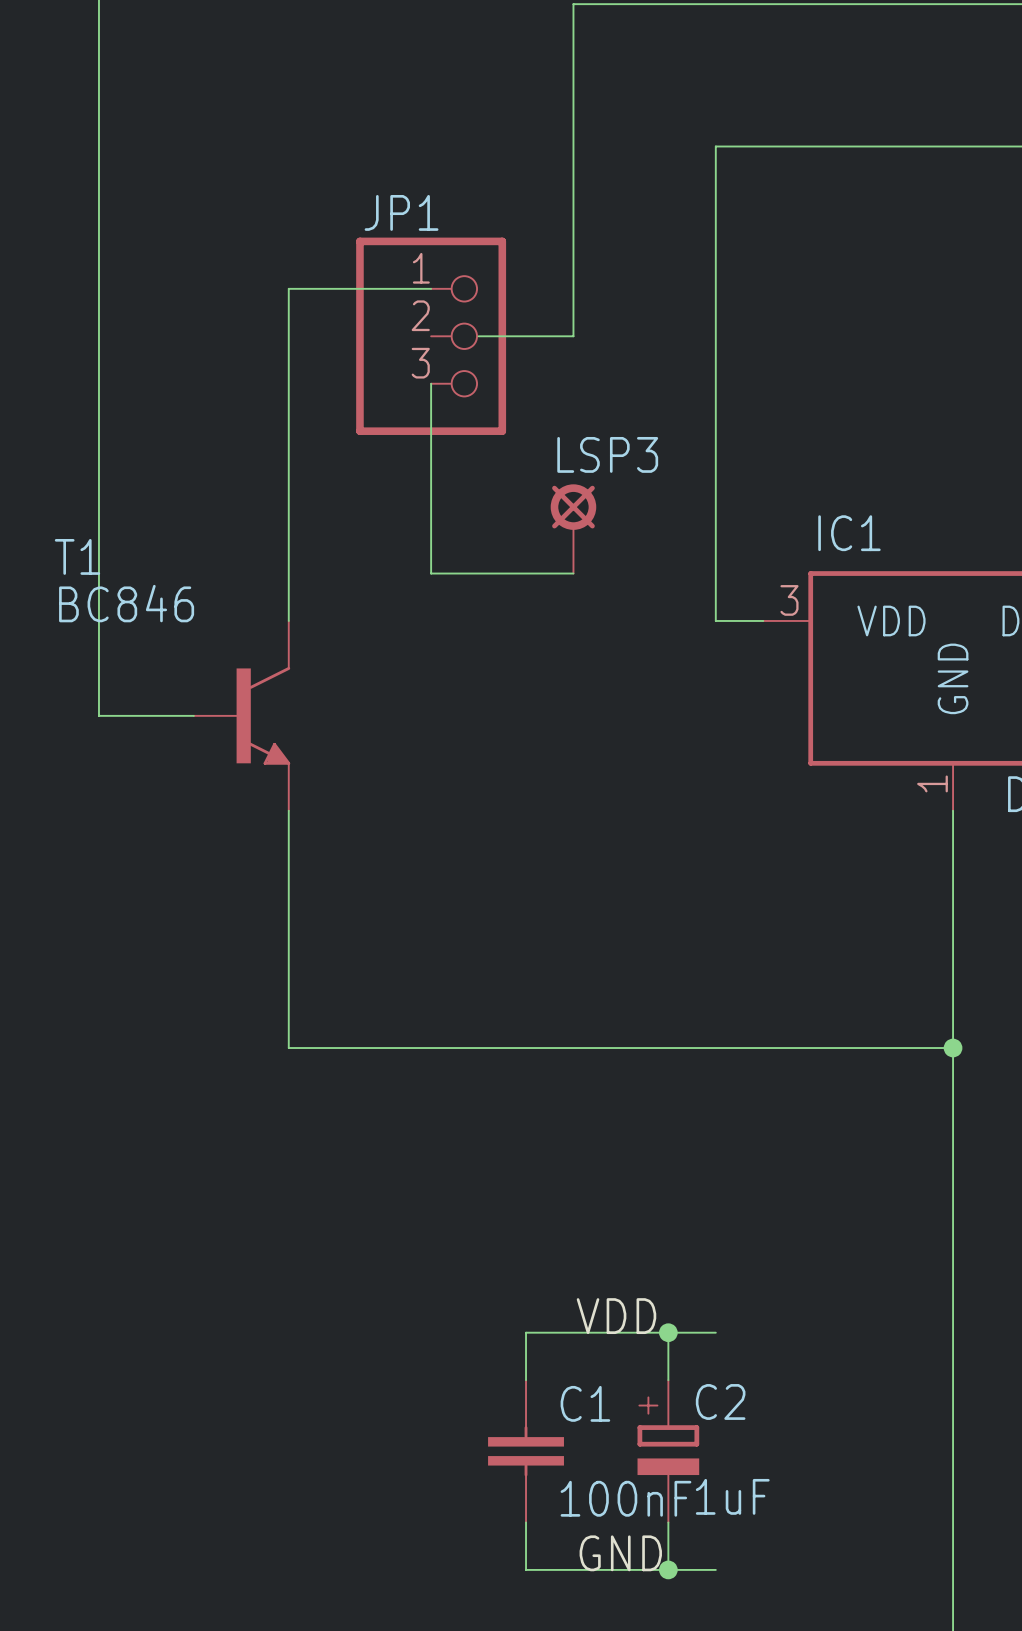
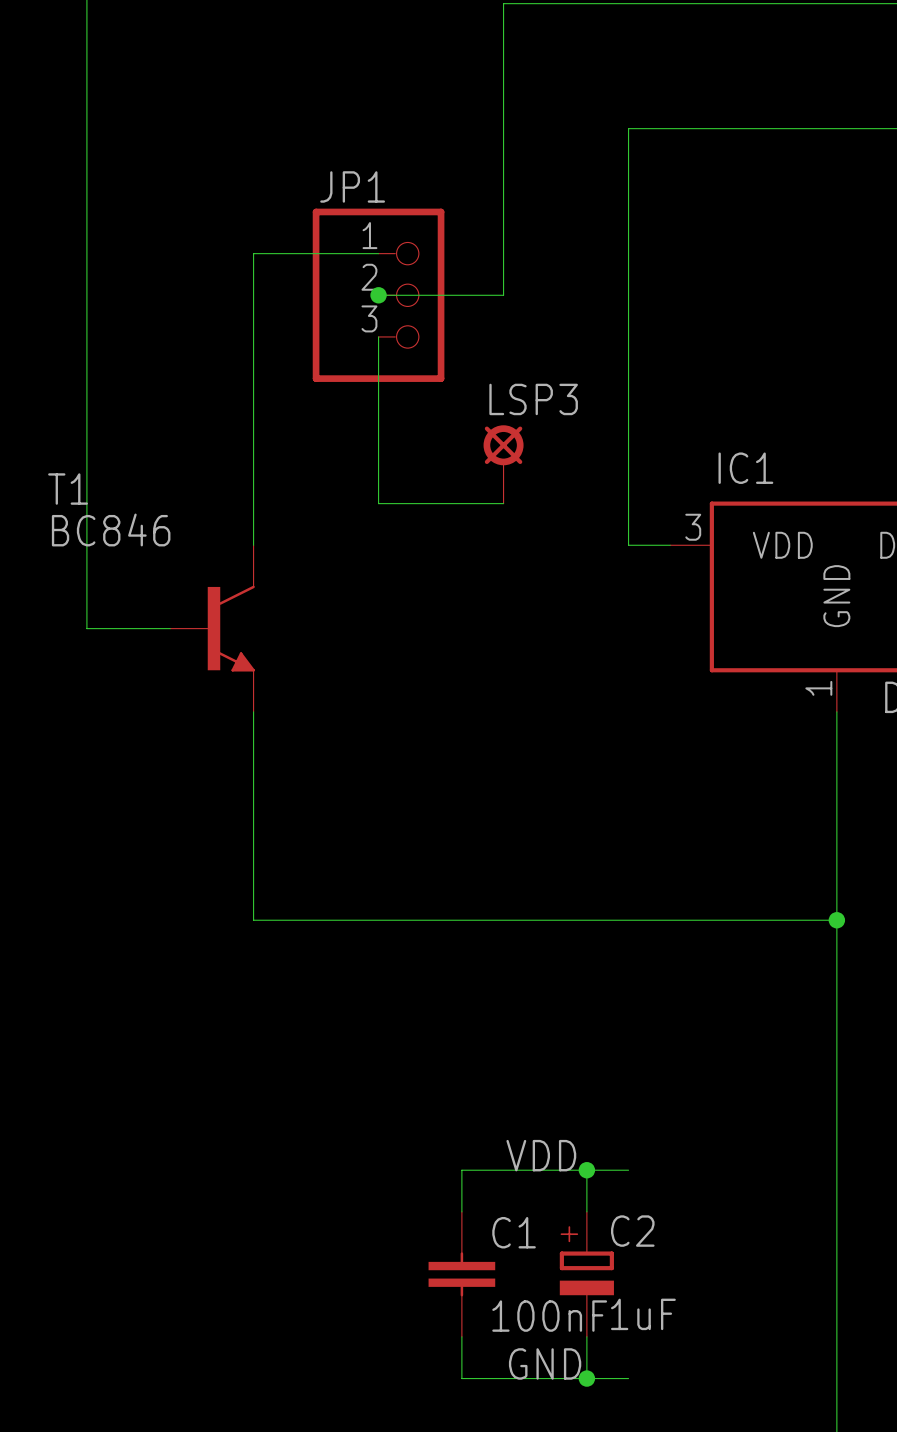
wire: none -> (378, 295) (420, 295)
junction: none -> (378, 295)

